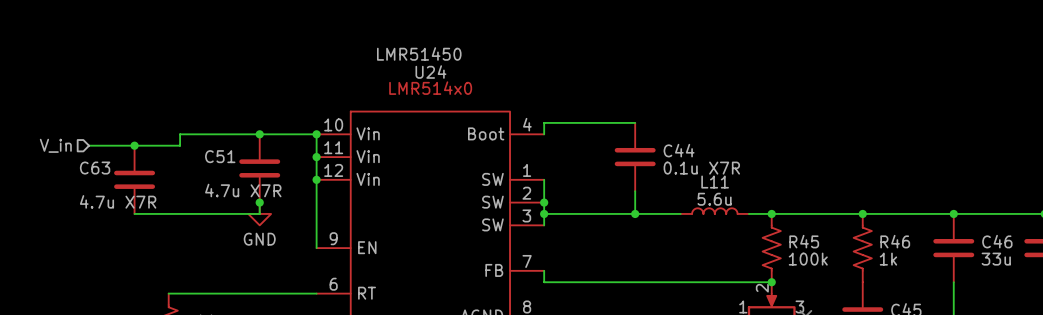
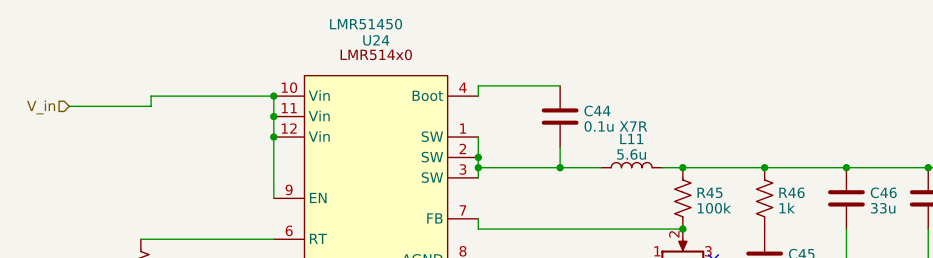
junction: (259, 134) -> none
junction: (134, 145) -> none
C51: 4.7u X7R (259, 168) -> none
C63: 4.7u X7R (134, 179) -> none
wire: (259, 202) (259, 213) (134, 213) -> none
junction: (259, 202) -> none
power symbol: GND (259, 213) -> none

